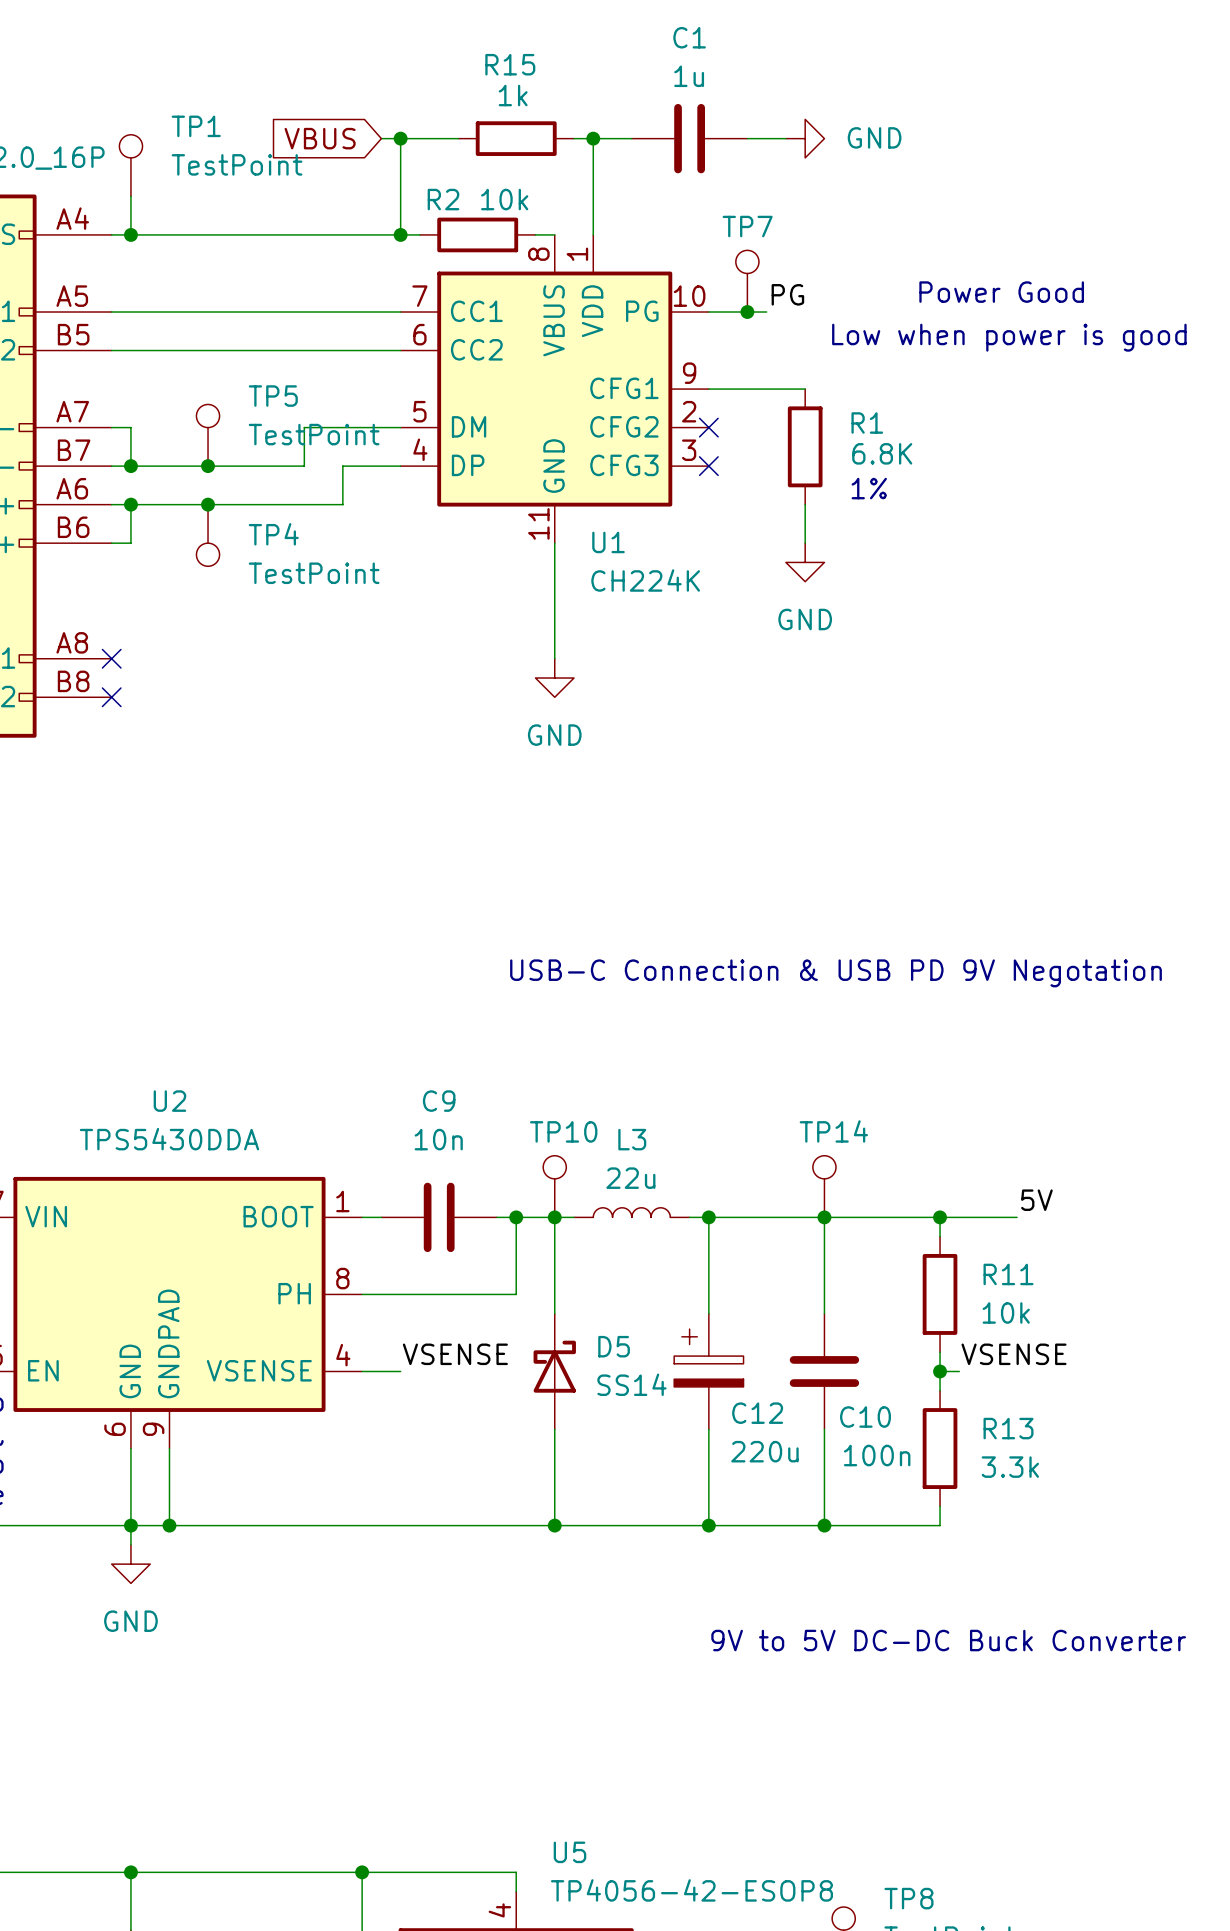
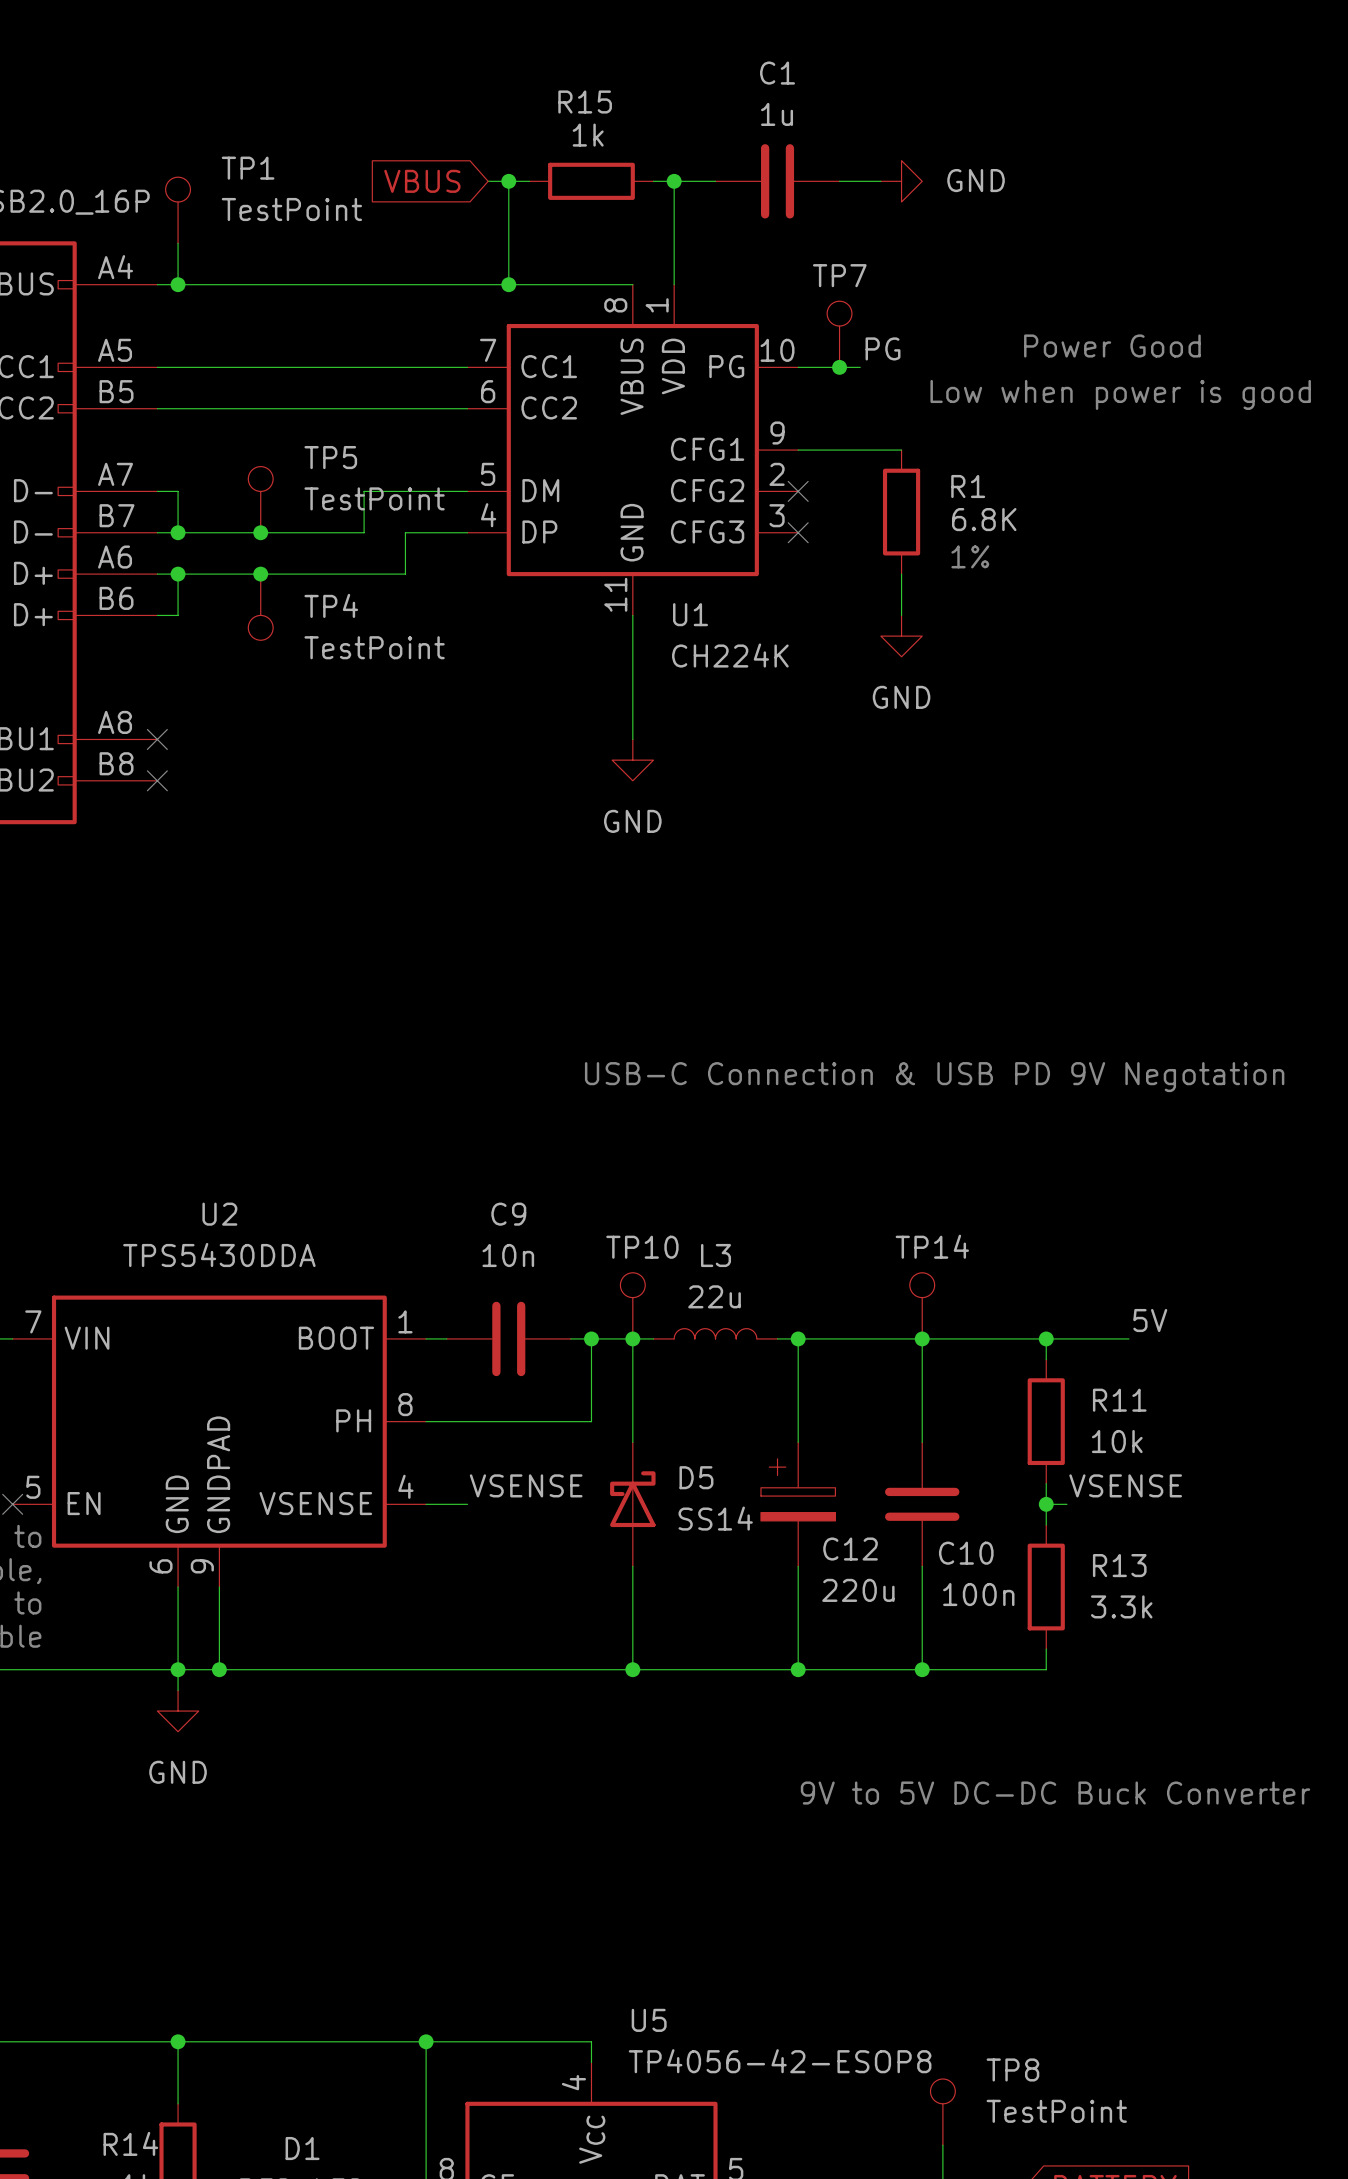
global label position: VBUS (320, 138) -> VBUS (422, 181)
wire: (381, 138) (419, 138) -> none
wire: (400, 138) (400, 234) -> (508, 181) (508, 284)
junction position: (400, 138) -> (508, 181)
junction position: (400, 234) -> (508, 284)
wire: none -> (488, 284) (612, 284)
R2: 10k (477, 234) -> none

